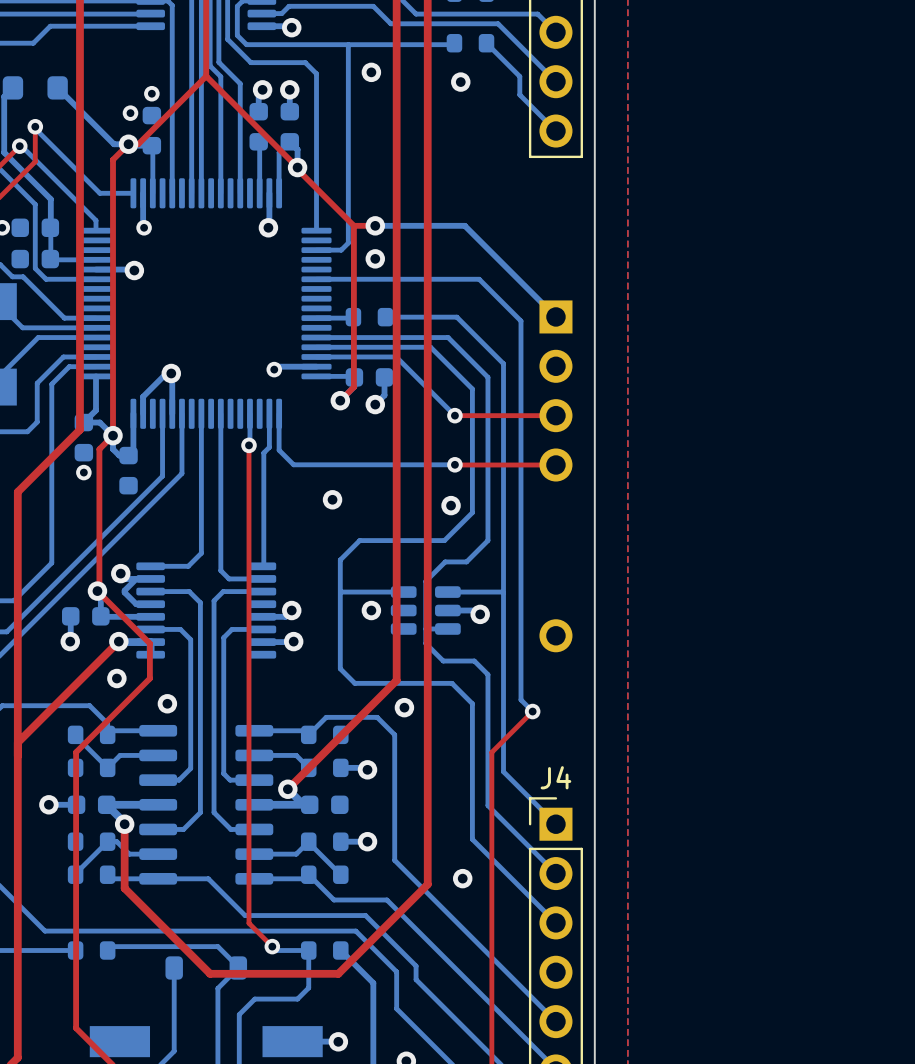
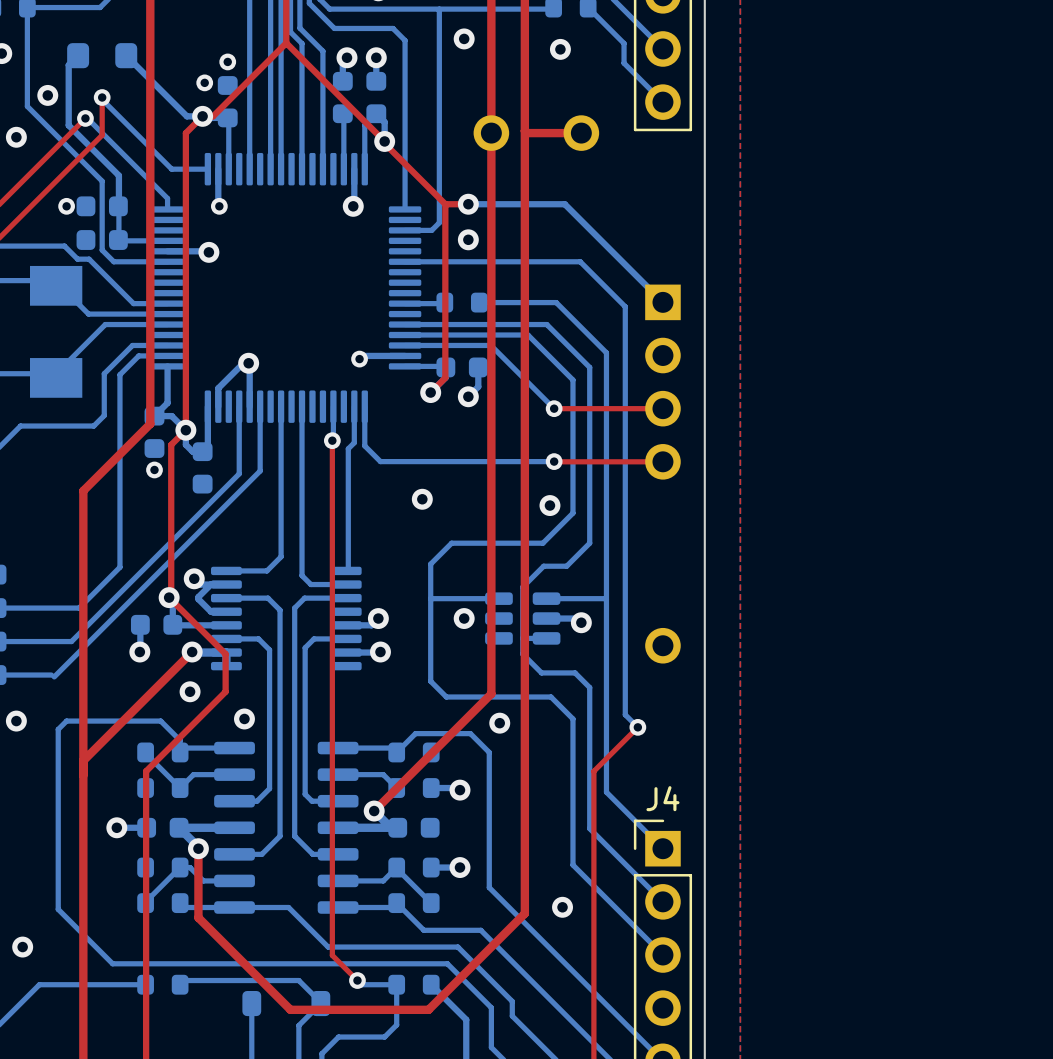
top track: none -> (524, 130) (526, 133) (581, 133)
part: none -> (491, 133)
part: none -> (581, 133)

